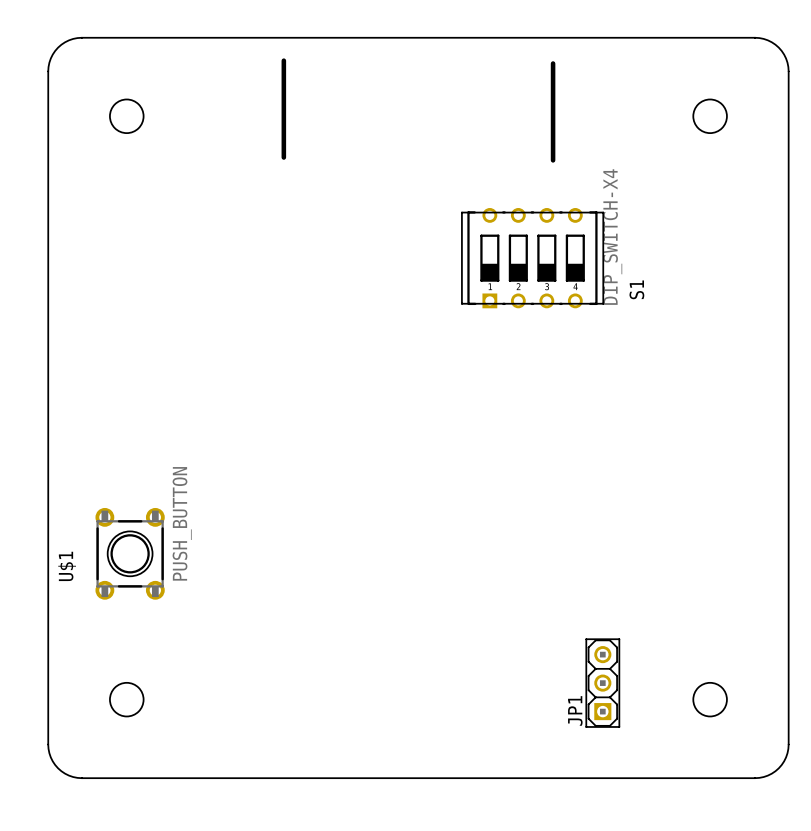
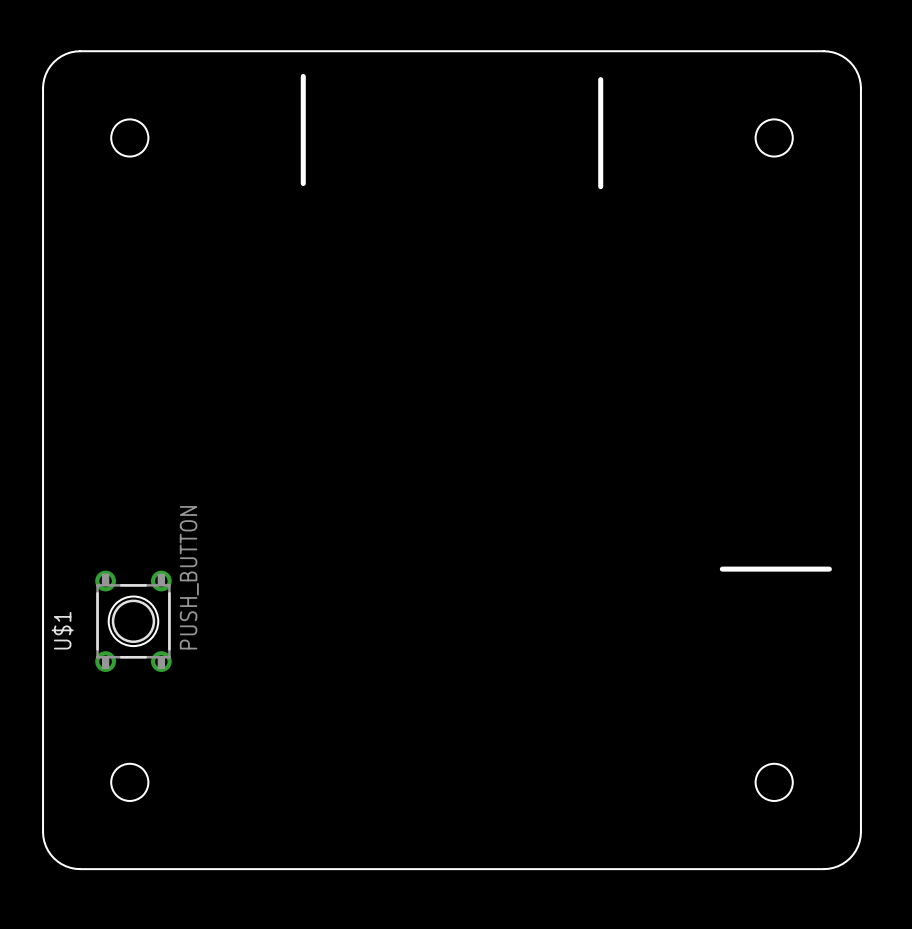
board edge: (461, 212) (461, 303) (603, 303) (603, 212) (461, 212) -> none
S1: DIP_SWITCH-X4 (532, 258) -> none
board edge: none -> (722, 569) (829, 569)
board edge: (586, 639) (586, 726) (619, 726) (619, 639) (586, 639) -> none
JP1: (602, 683) -> none

